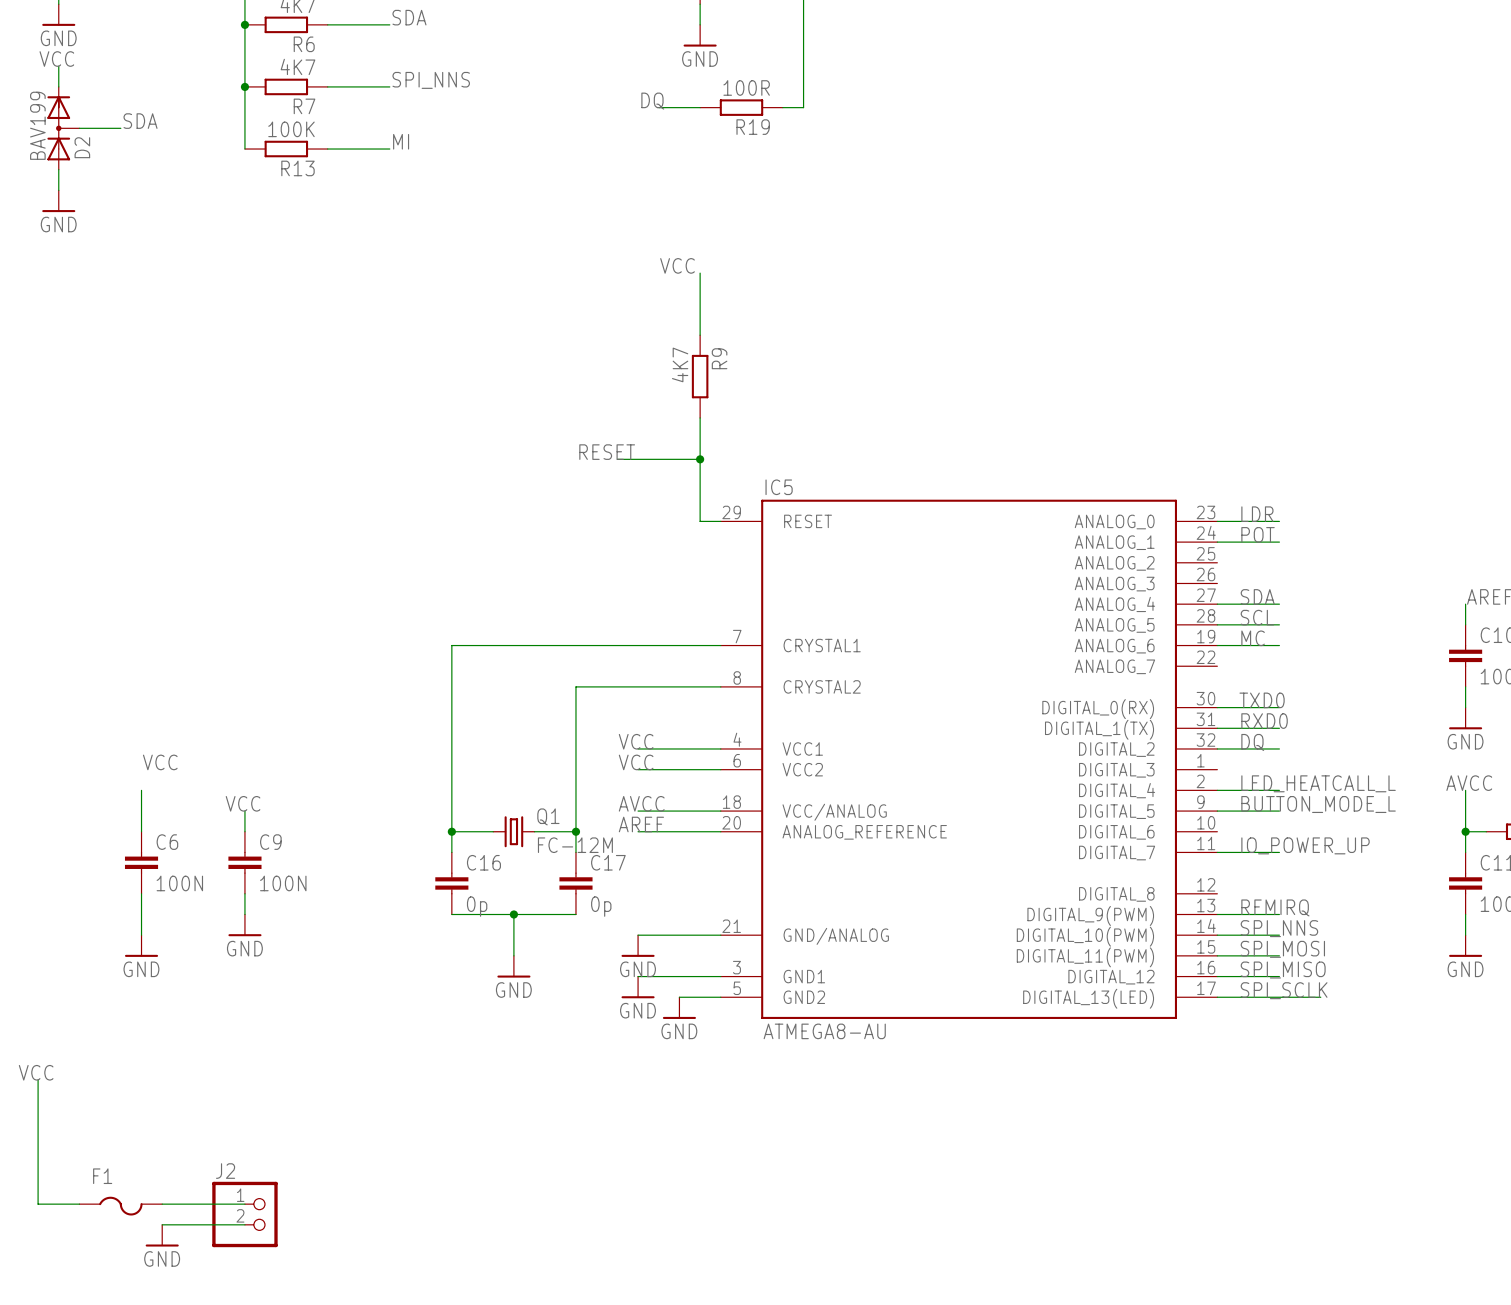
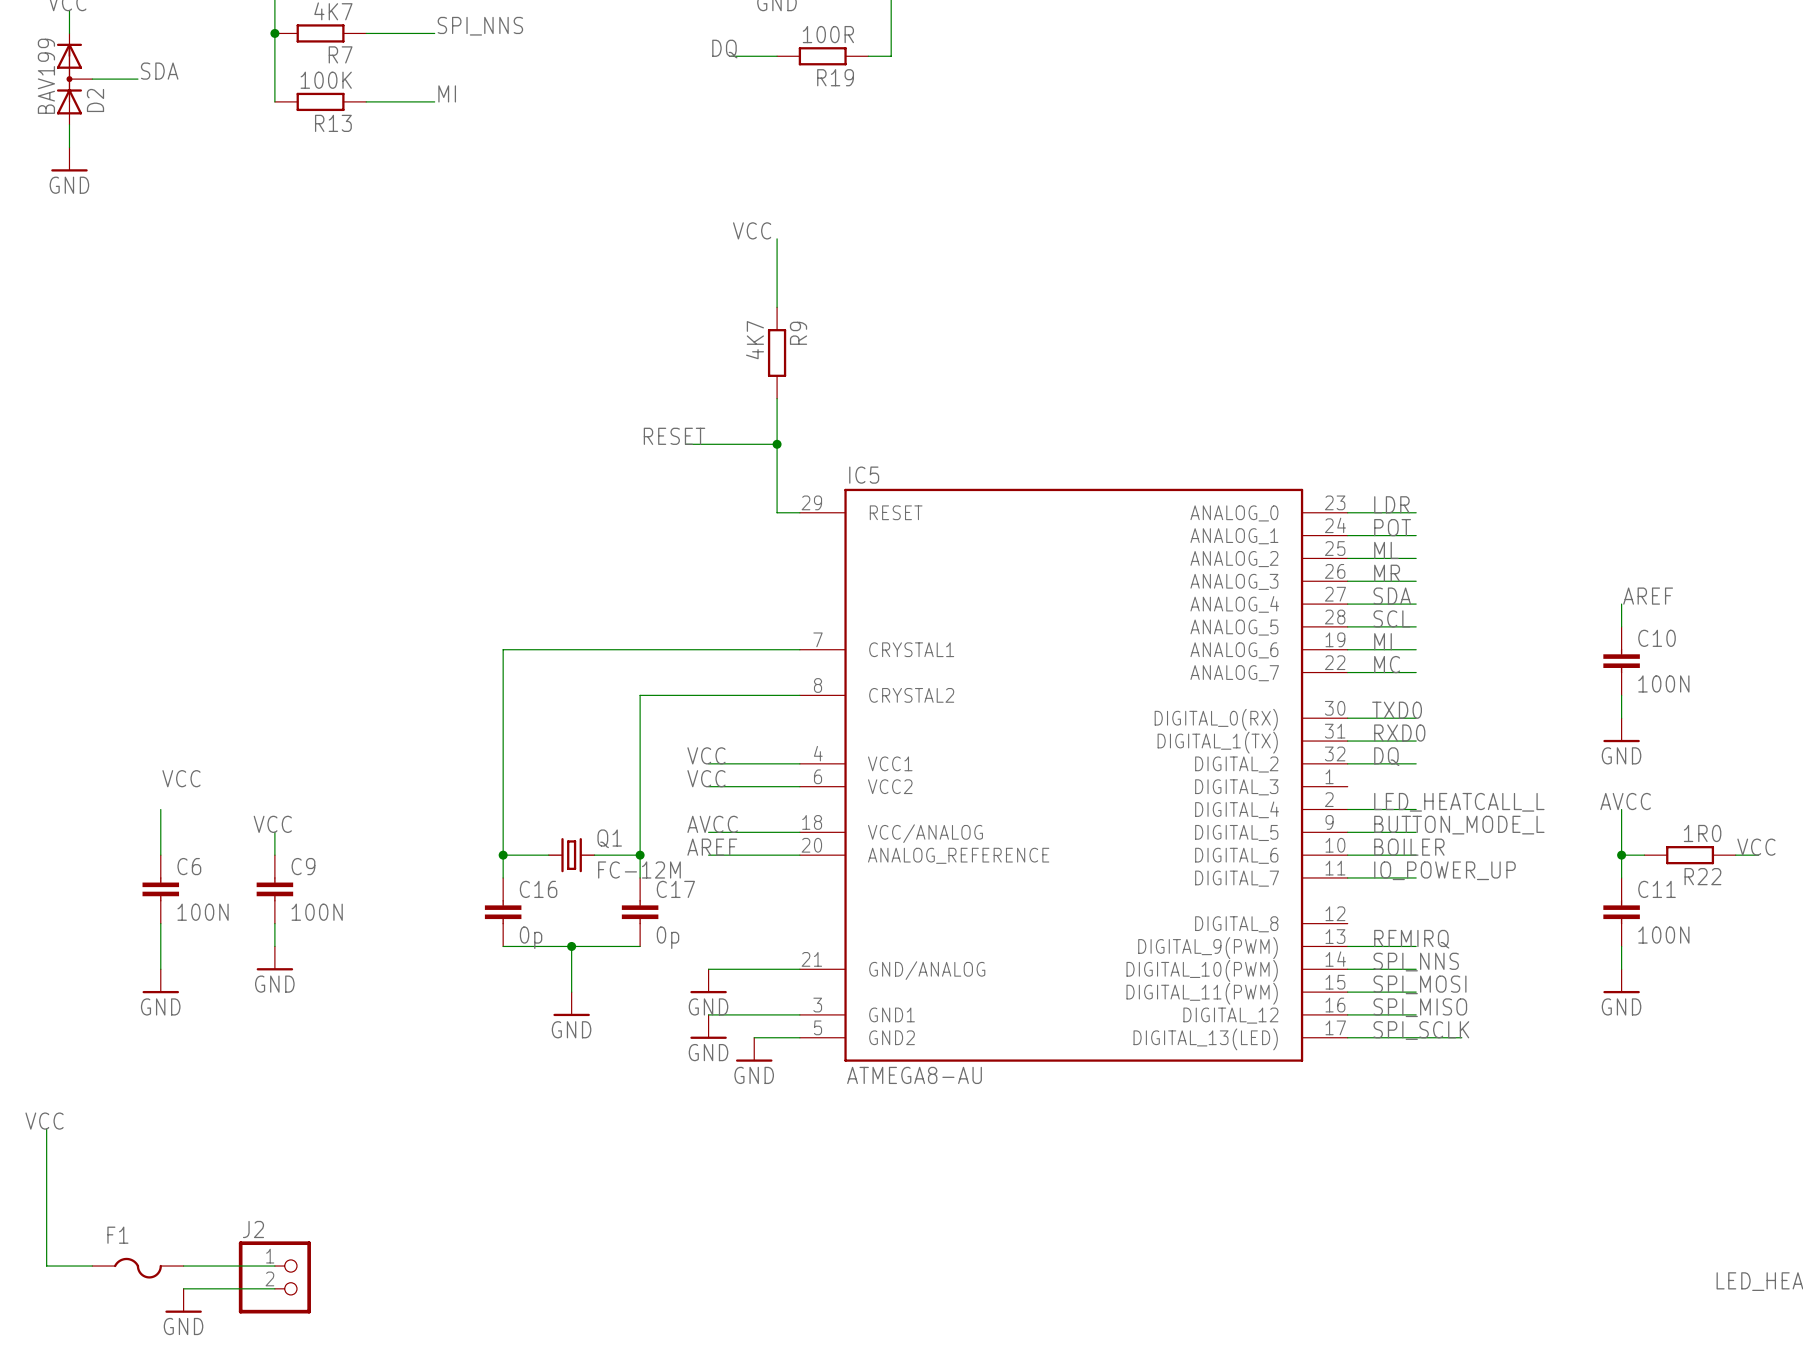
label: none -> ML (1386, 550)
wire: none -> (1347, 558) (1416, 558)
label: none -> MR (1387, 573)
wire: none -> (1347, 581) (1416, 581)
label: MC (1253, 638) -> MI (1383, 641)
label: none -> MC (1387, 664)
wire: none -> (1347, 672) (1416, 672)
label: none -> BOILER (1409, 847)
wire: none -> (1347, 855) (1416, 855)

